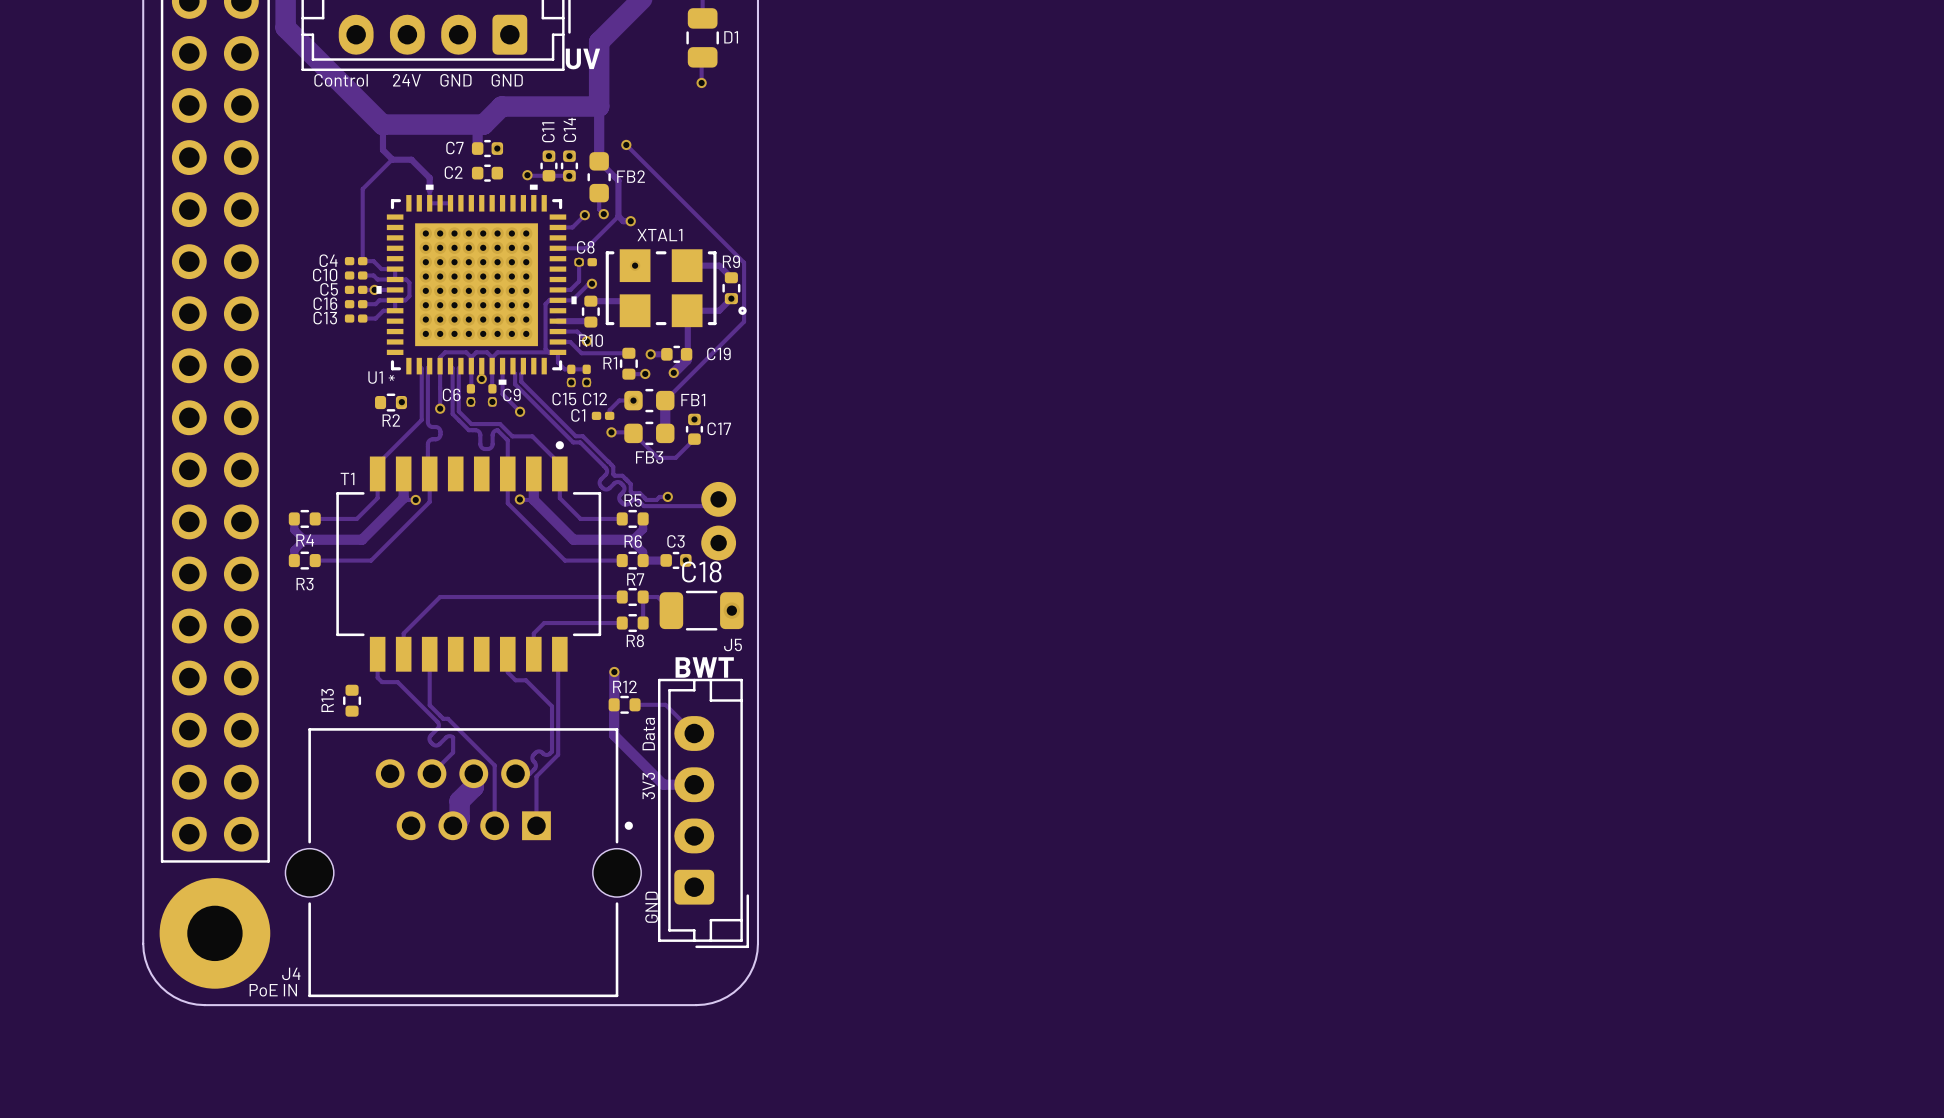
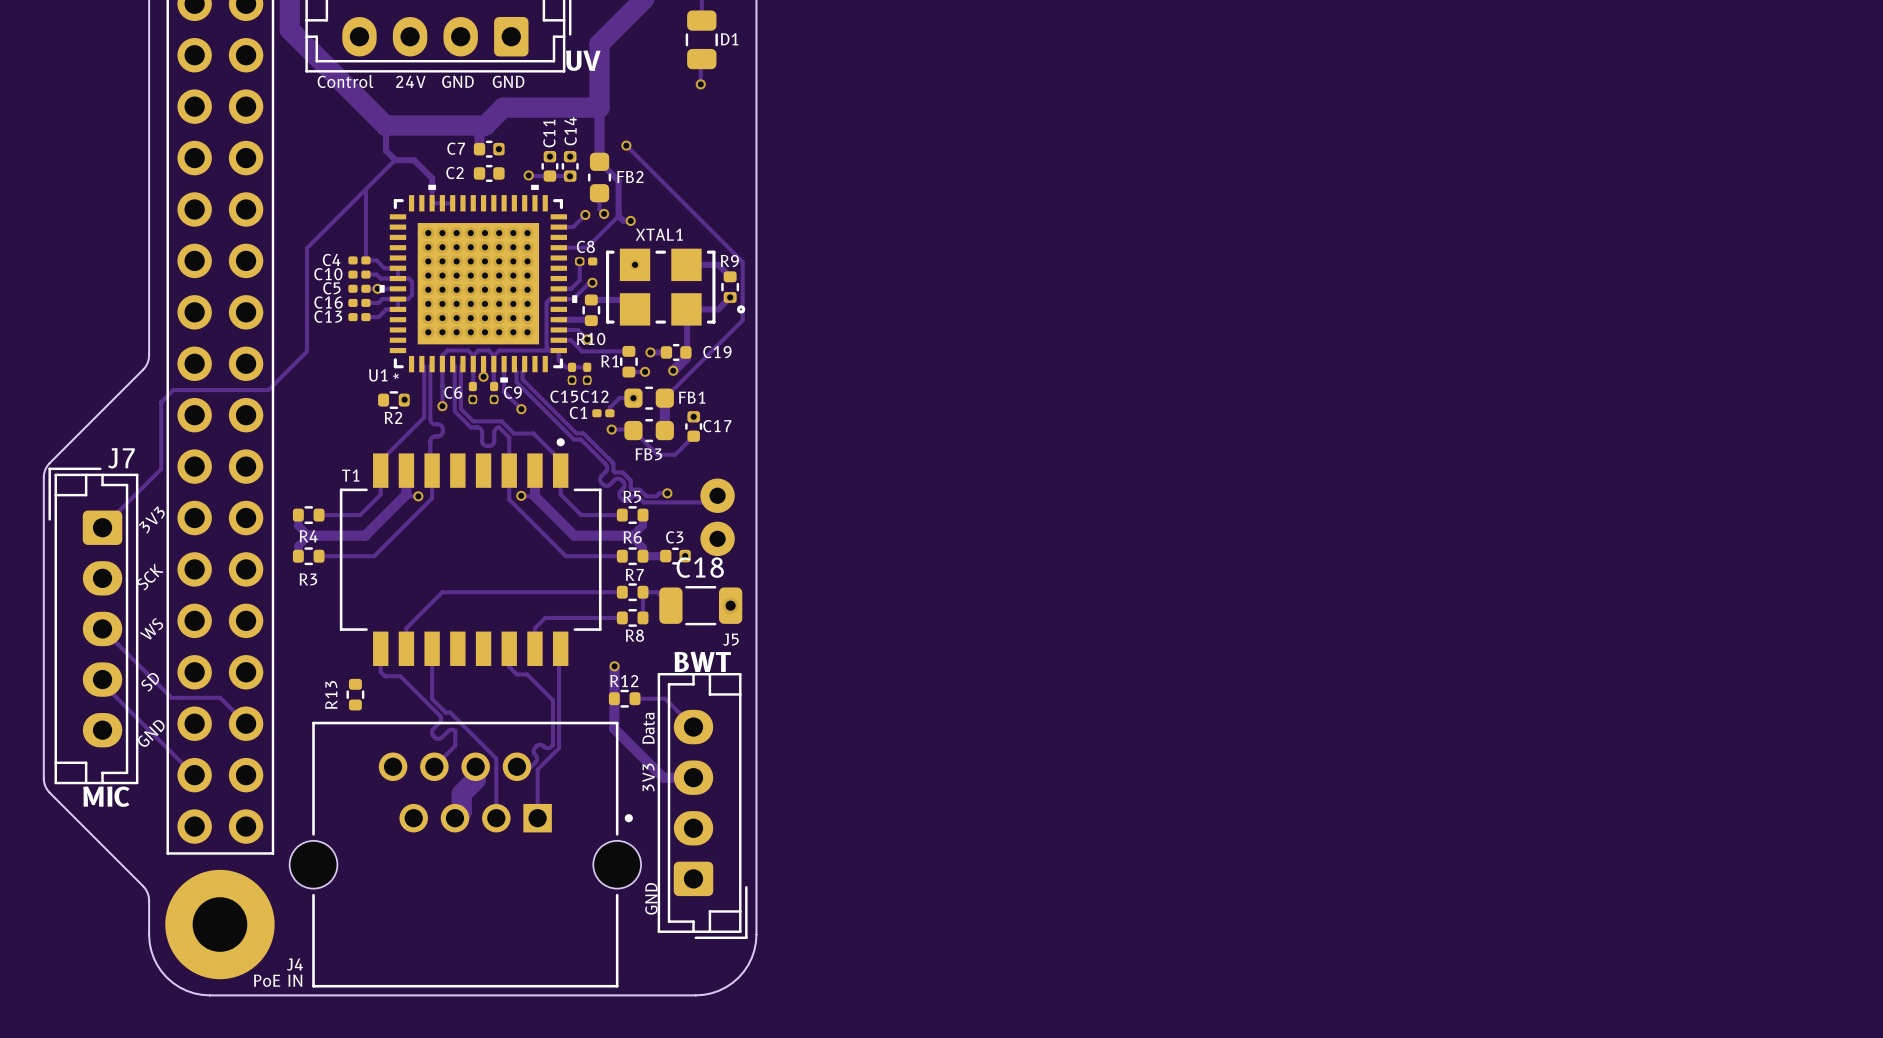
track: none -> (365, 189) (307, 248) (307, 351) (268, 390) (173, 390) (161, 402) (161, 469) (102, 527)
board edge: (143, 357) (143, 909) -> (149, 355) (144, 368) (49, 463) (45, 469) (43, 477) (44, 783) (49, 792) (143, 886) (147, 892) (149, 900)
text: none -> 3V3 (151, 519)
text: none -> SCK (150, 576)
J7: none -> (93, 625)
text: none -> WS (151, 628)
track: none -> (102, 628) (171, 697) (220, 697) (246, 723)
text: none -> SD (150, 682)
track: none -> (102, 683) (194, 775)
text: none -> GND (151, 733)
text: none -> MIC (106, 796)

